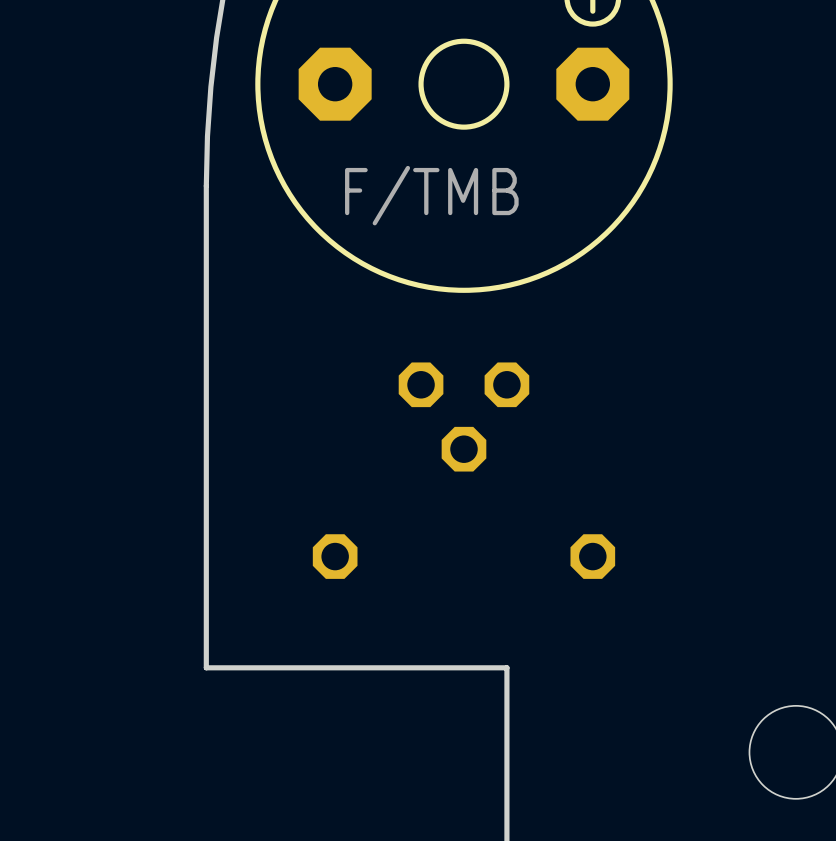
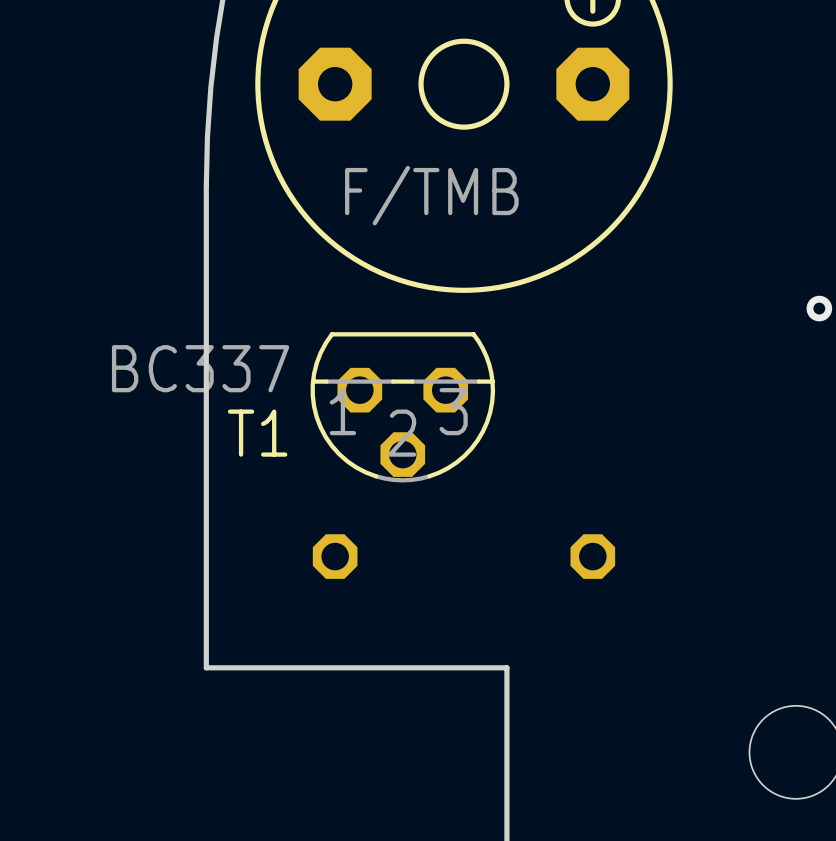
via: none -> (819, 308)
T1 side: bottom (463, 416) -> top (402, 407)

